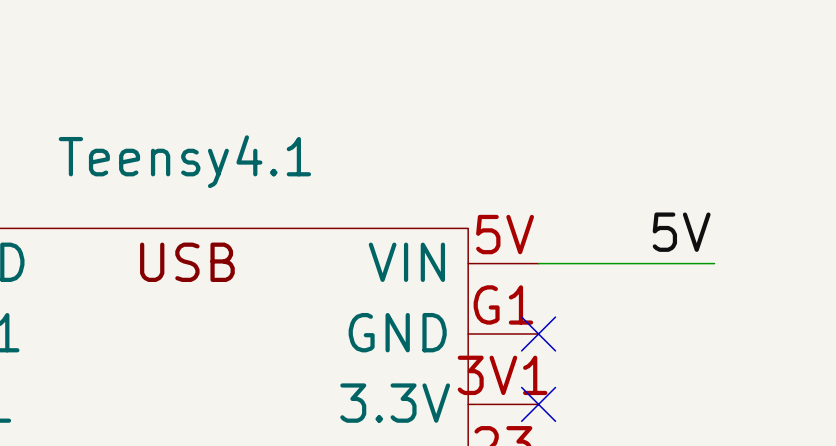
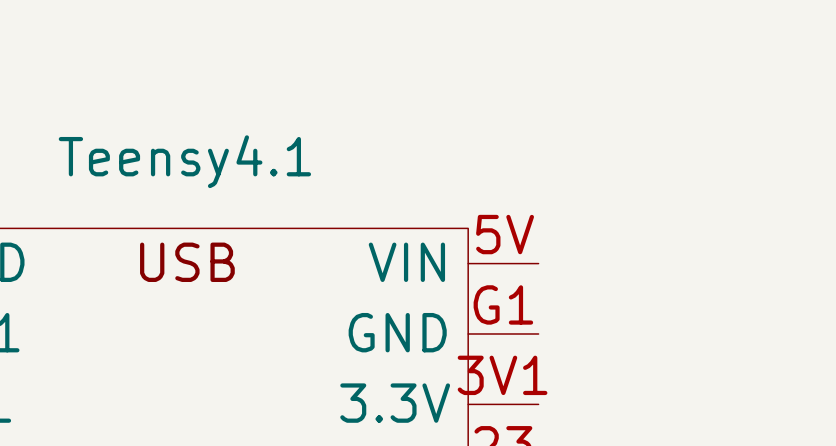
label: 5V (681, 232) -> none
wire: (538, 263) (714, 263) -> none
no-connect mark: (538, 333) -> none
no-connect mark: (538, 404) -> none

